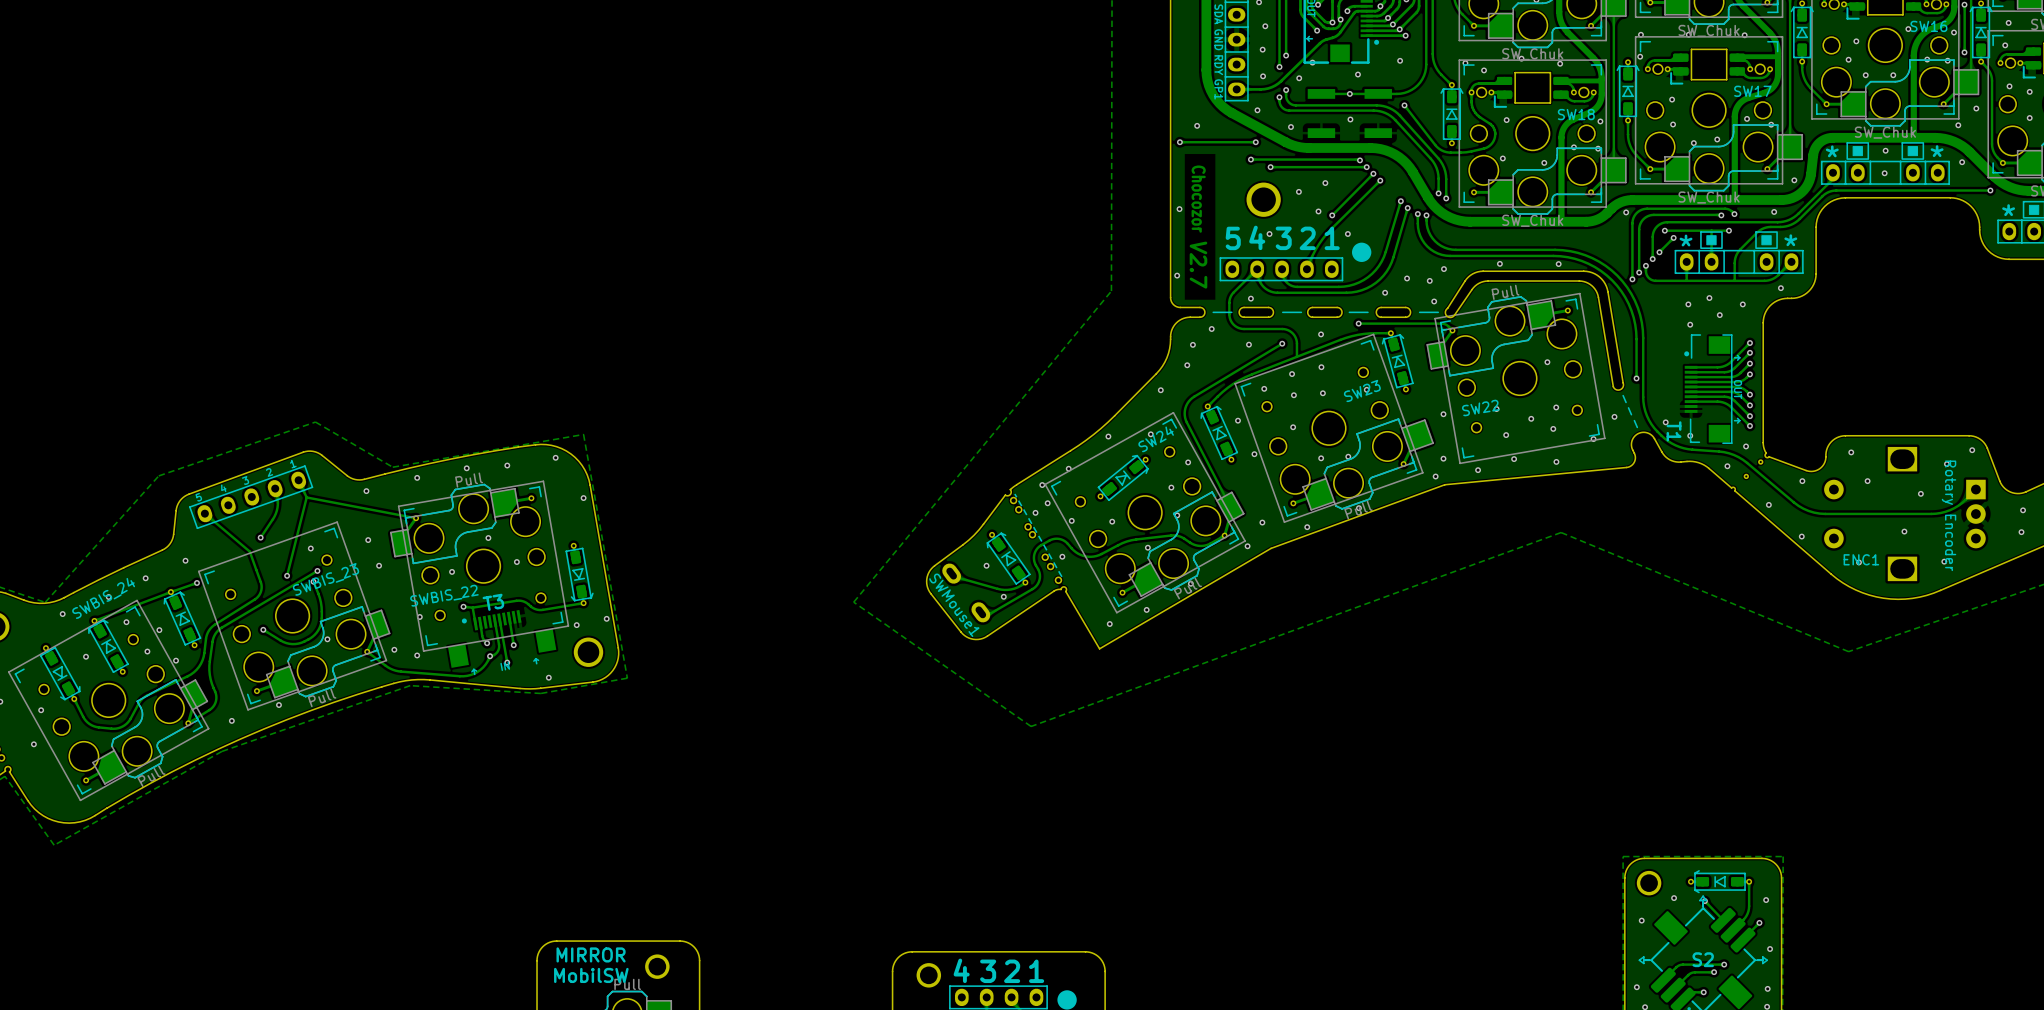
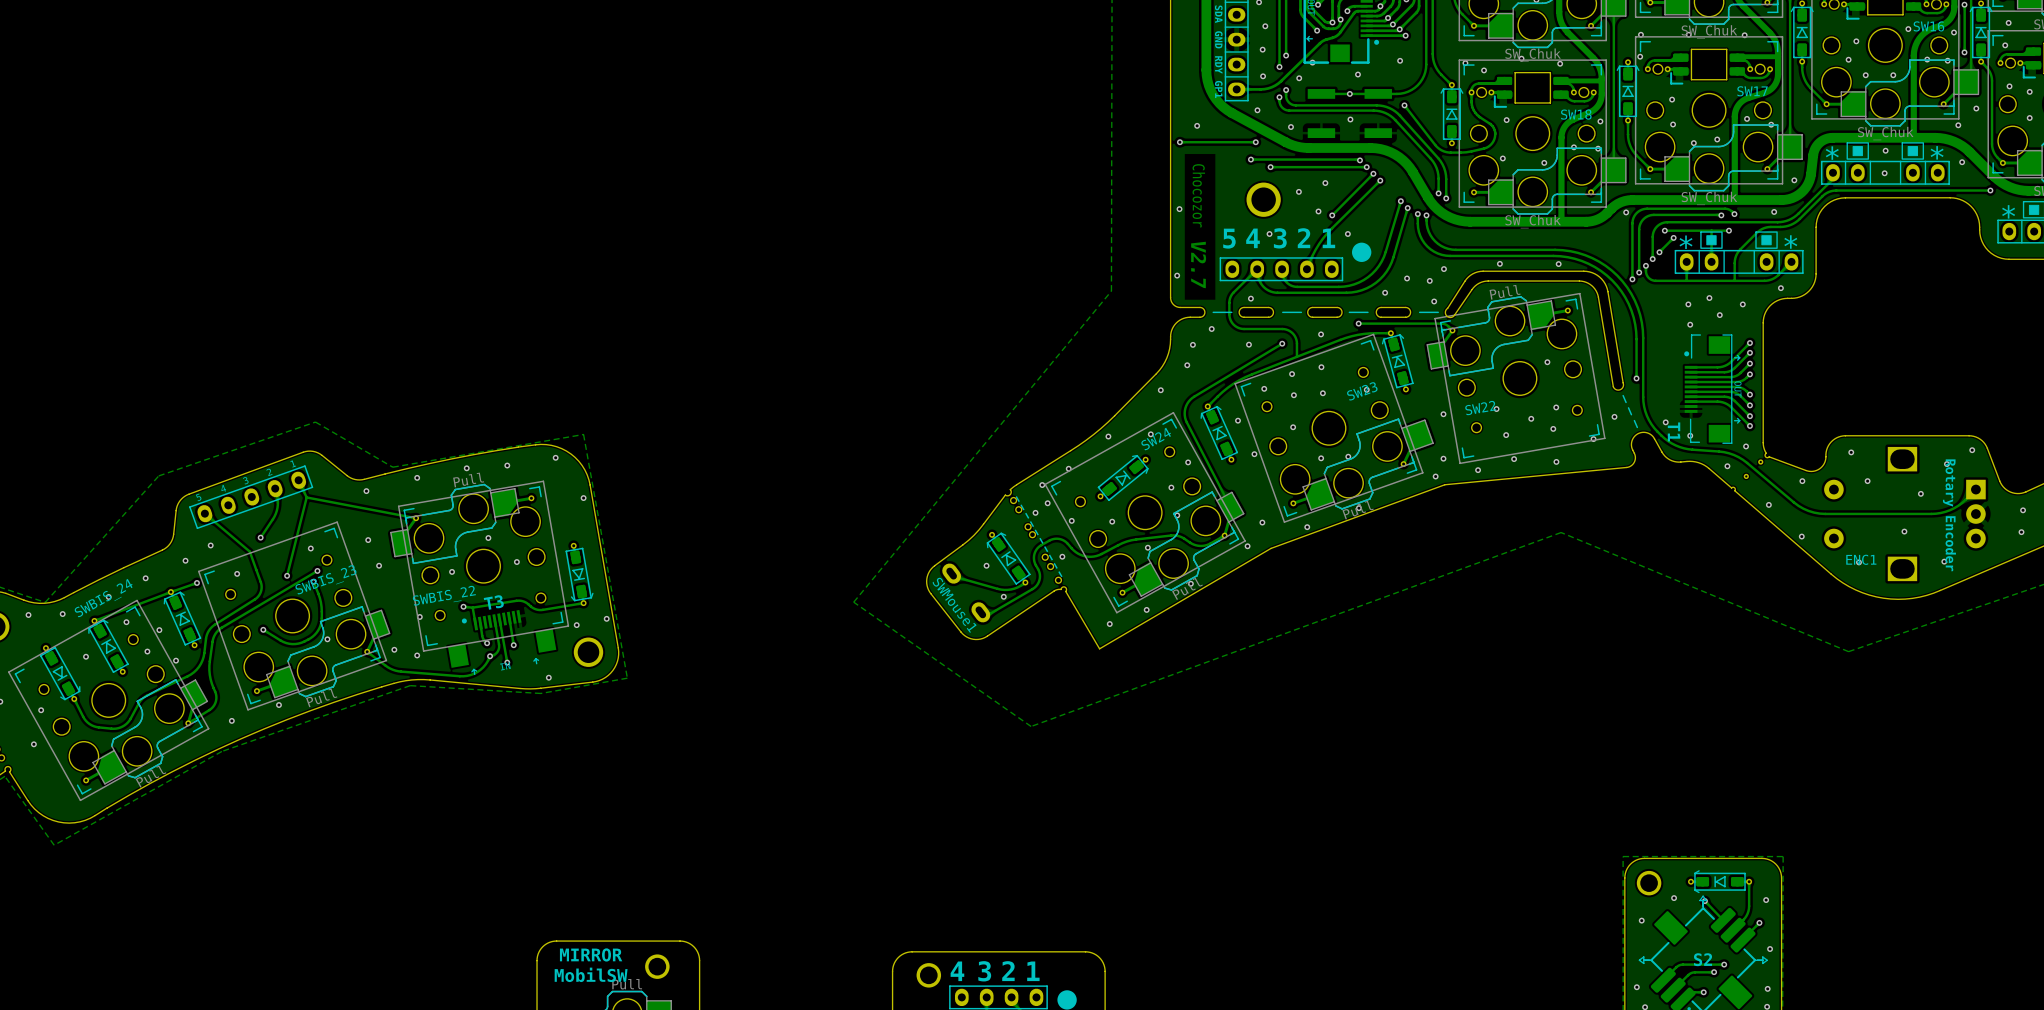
via: none -> (210, 545)
via: none -> (237, 573)
via: none -> (28, 615)

